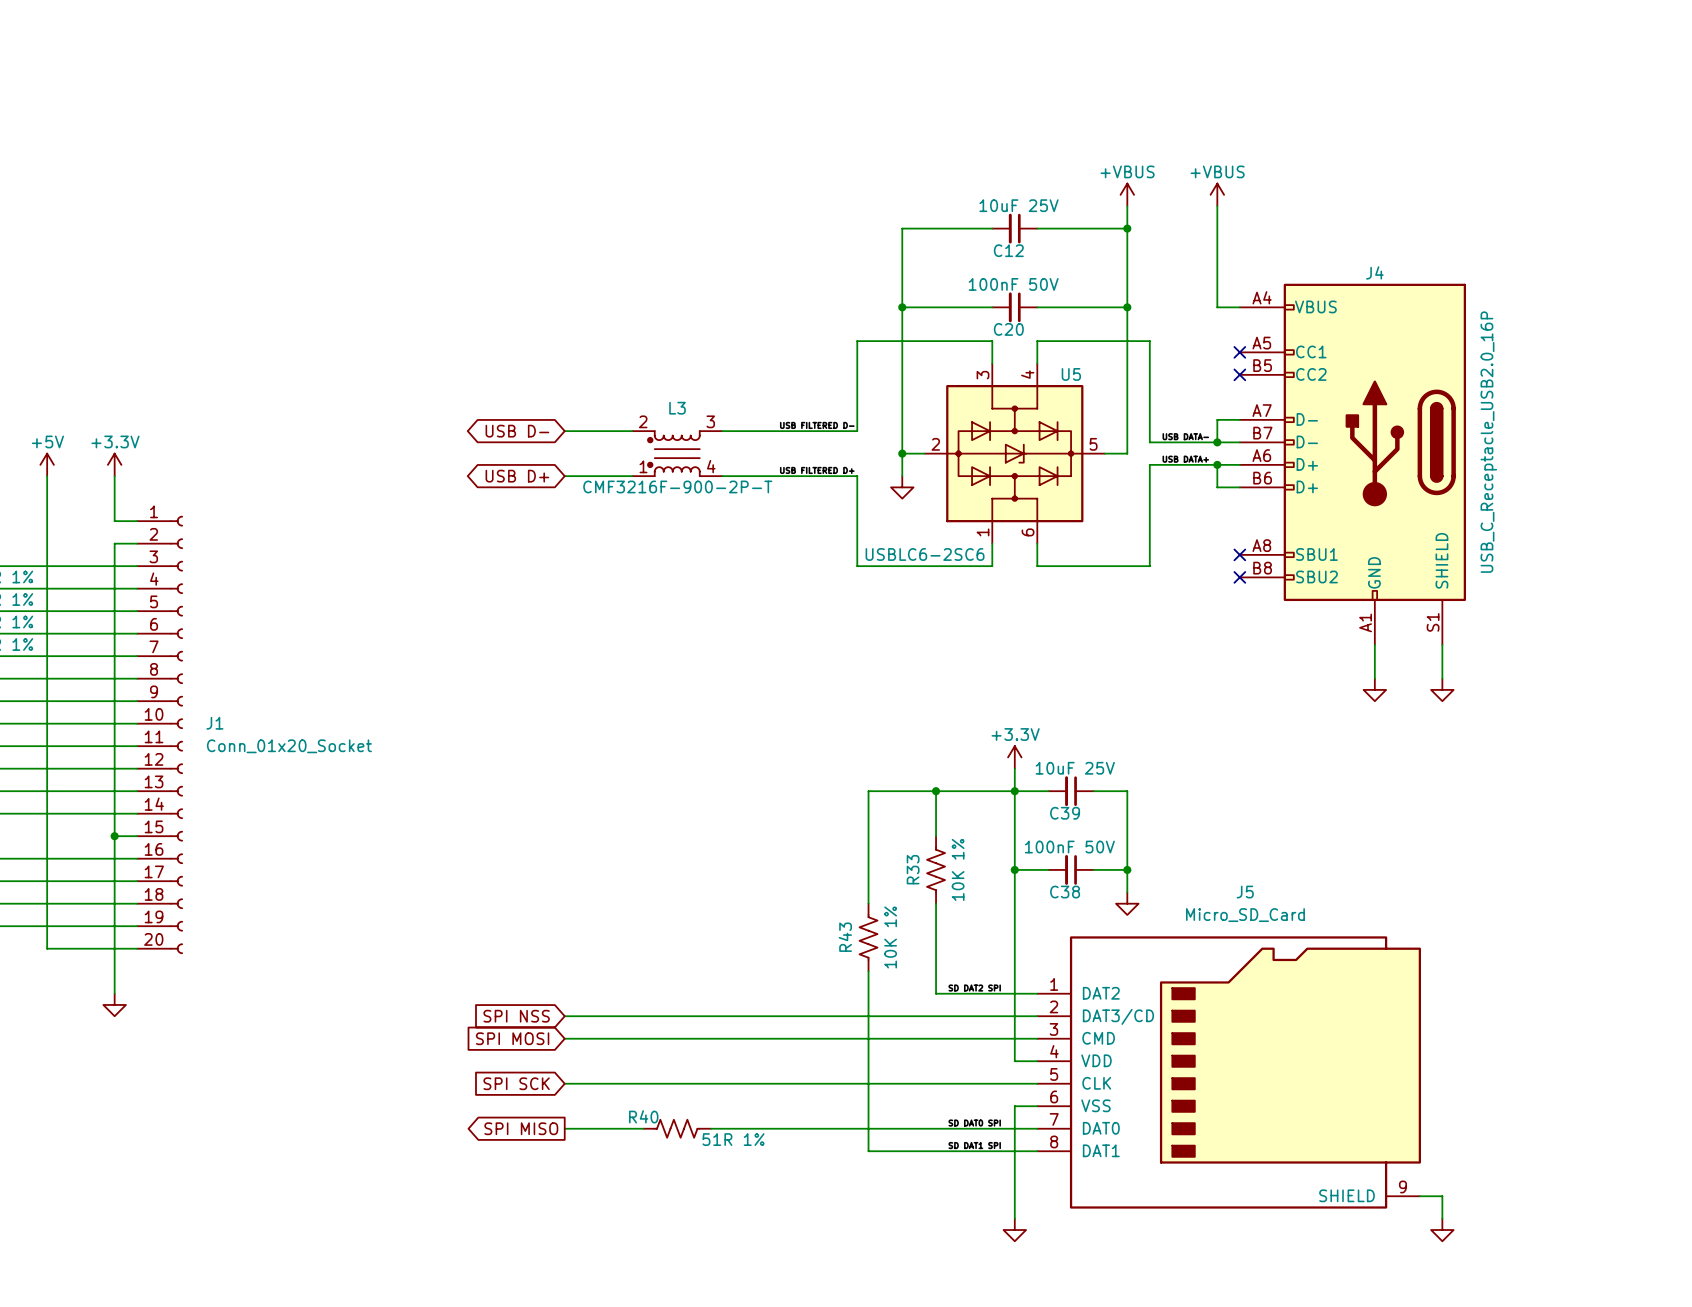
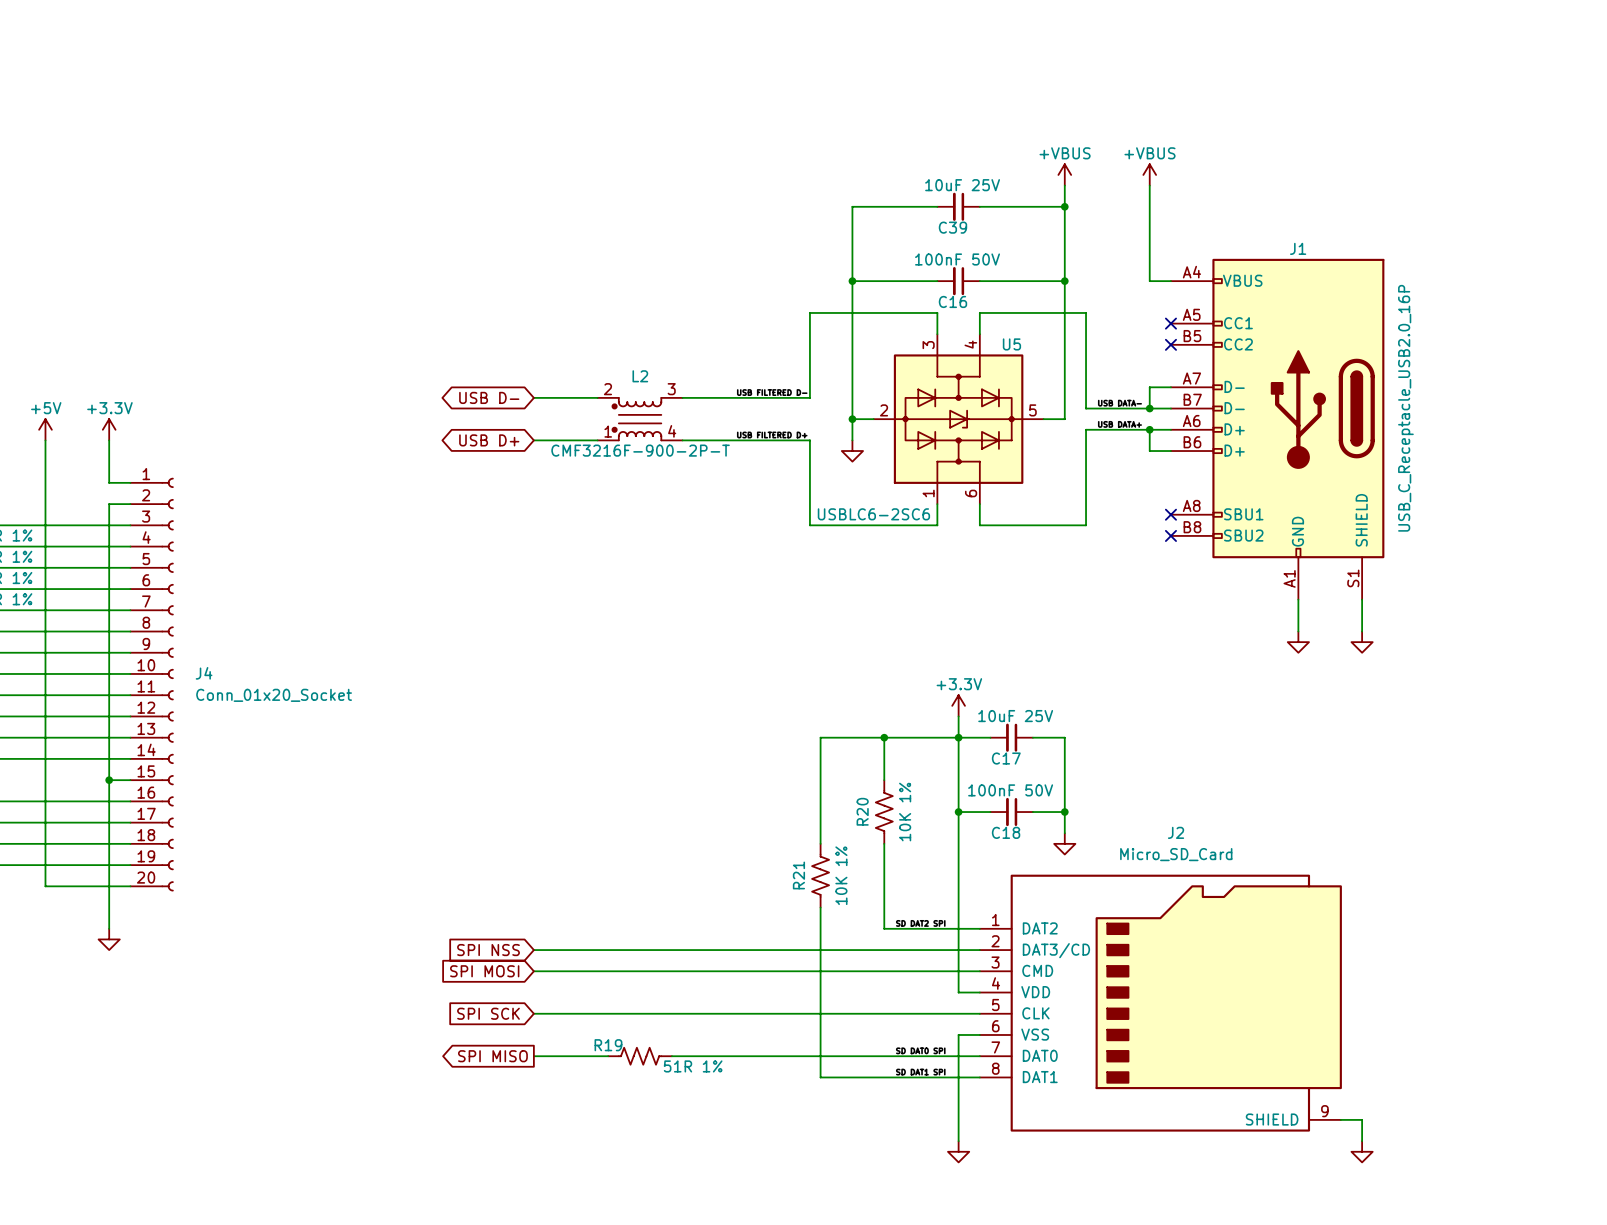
C12 name: C12 (1008, 250) -> C39 (952, 227)
J4 name: J4 (1374, 272) -> J1 (1298, 248)
C20 name: C20 (1008, 329) -> C16 (952, 301)
L3 name: L3 (677, 408) -> L2 (640, 376)
J1 name: J1 (214, 723) -> J4 (204, 673)
C39 name: C39 (1065, 813) -> C17 (1006, 758)
R33 name: R33 (913, 869) -> R20 (862, 811)
C38 name: C38 (1065, 892) -> C18 (1006, 832)
J5 name: J5 (1245, 892) -> J2 (1176, 832)
R43 name: R43 (845, 937) -> R21 (798, 875)
R40 name: R40 (643, 1116) -> R19 (608, 1045)

